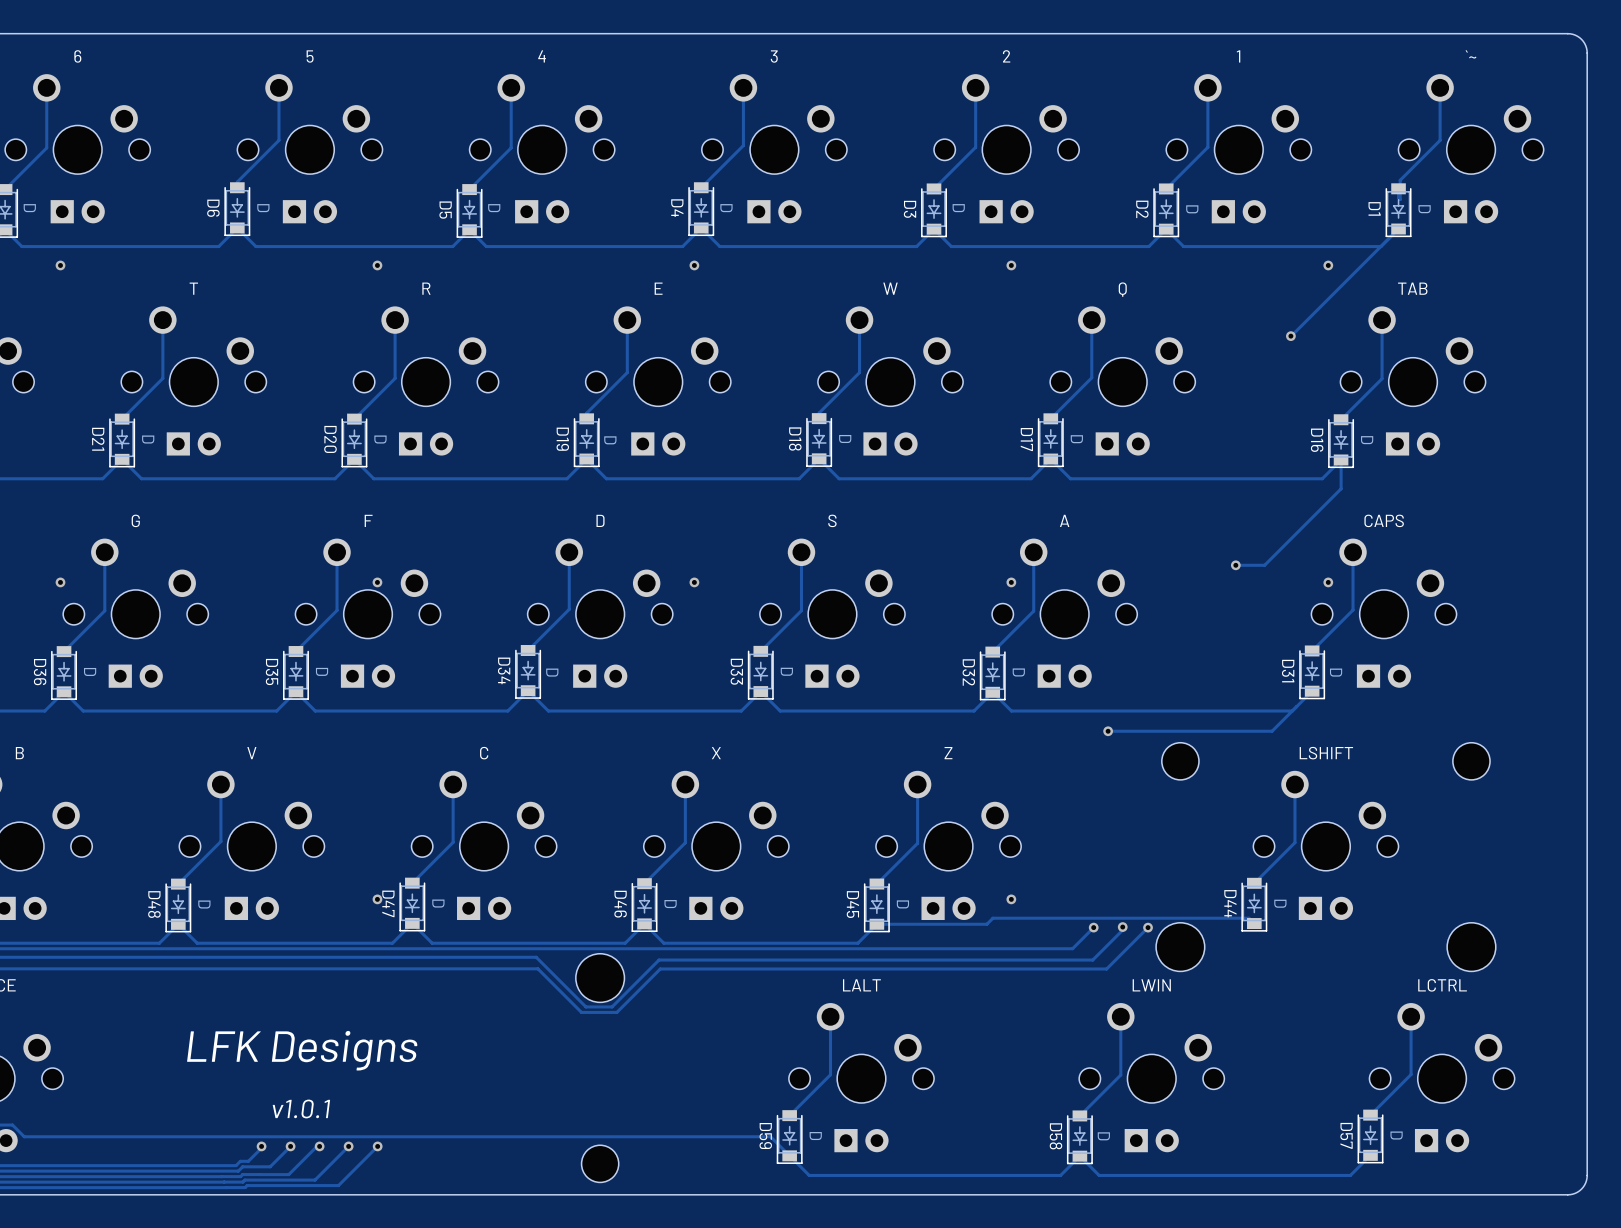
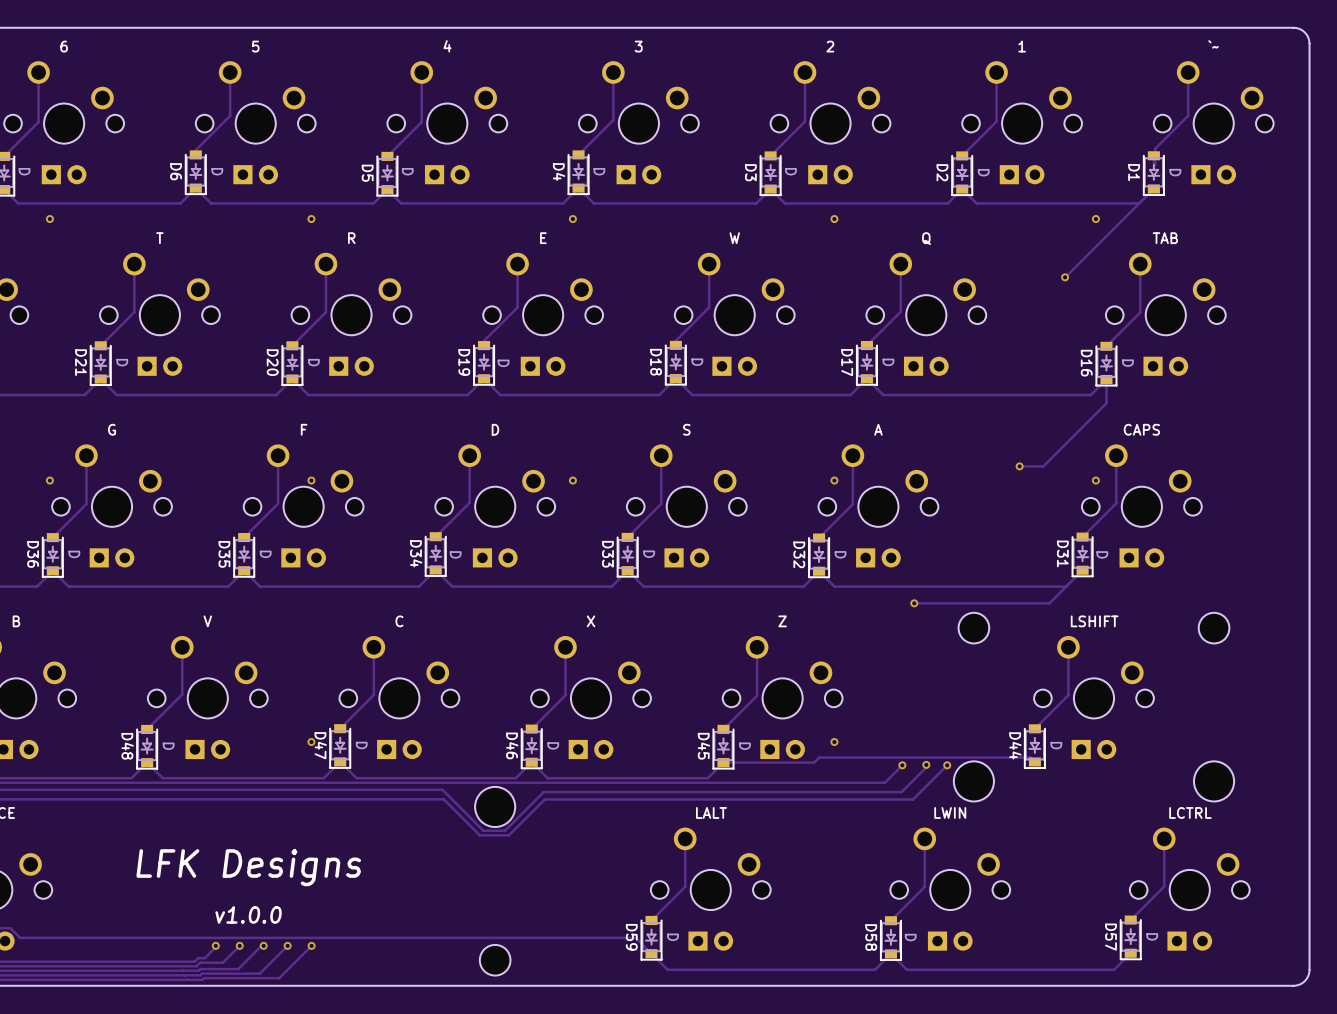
part text: v1.0.1 (301, 1108) -> v1.0.0 (248, 914)

